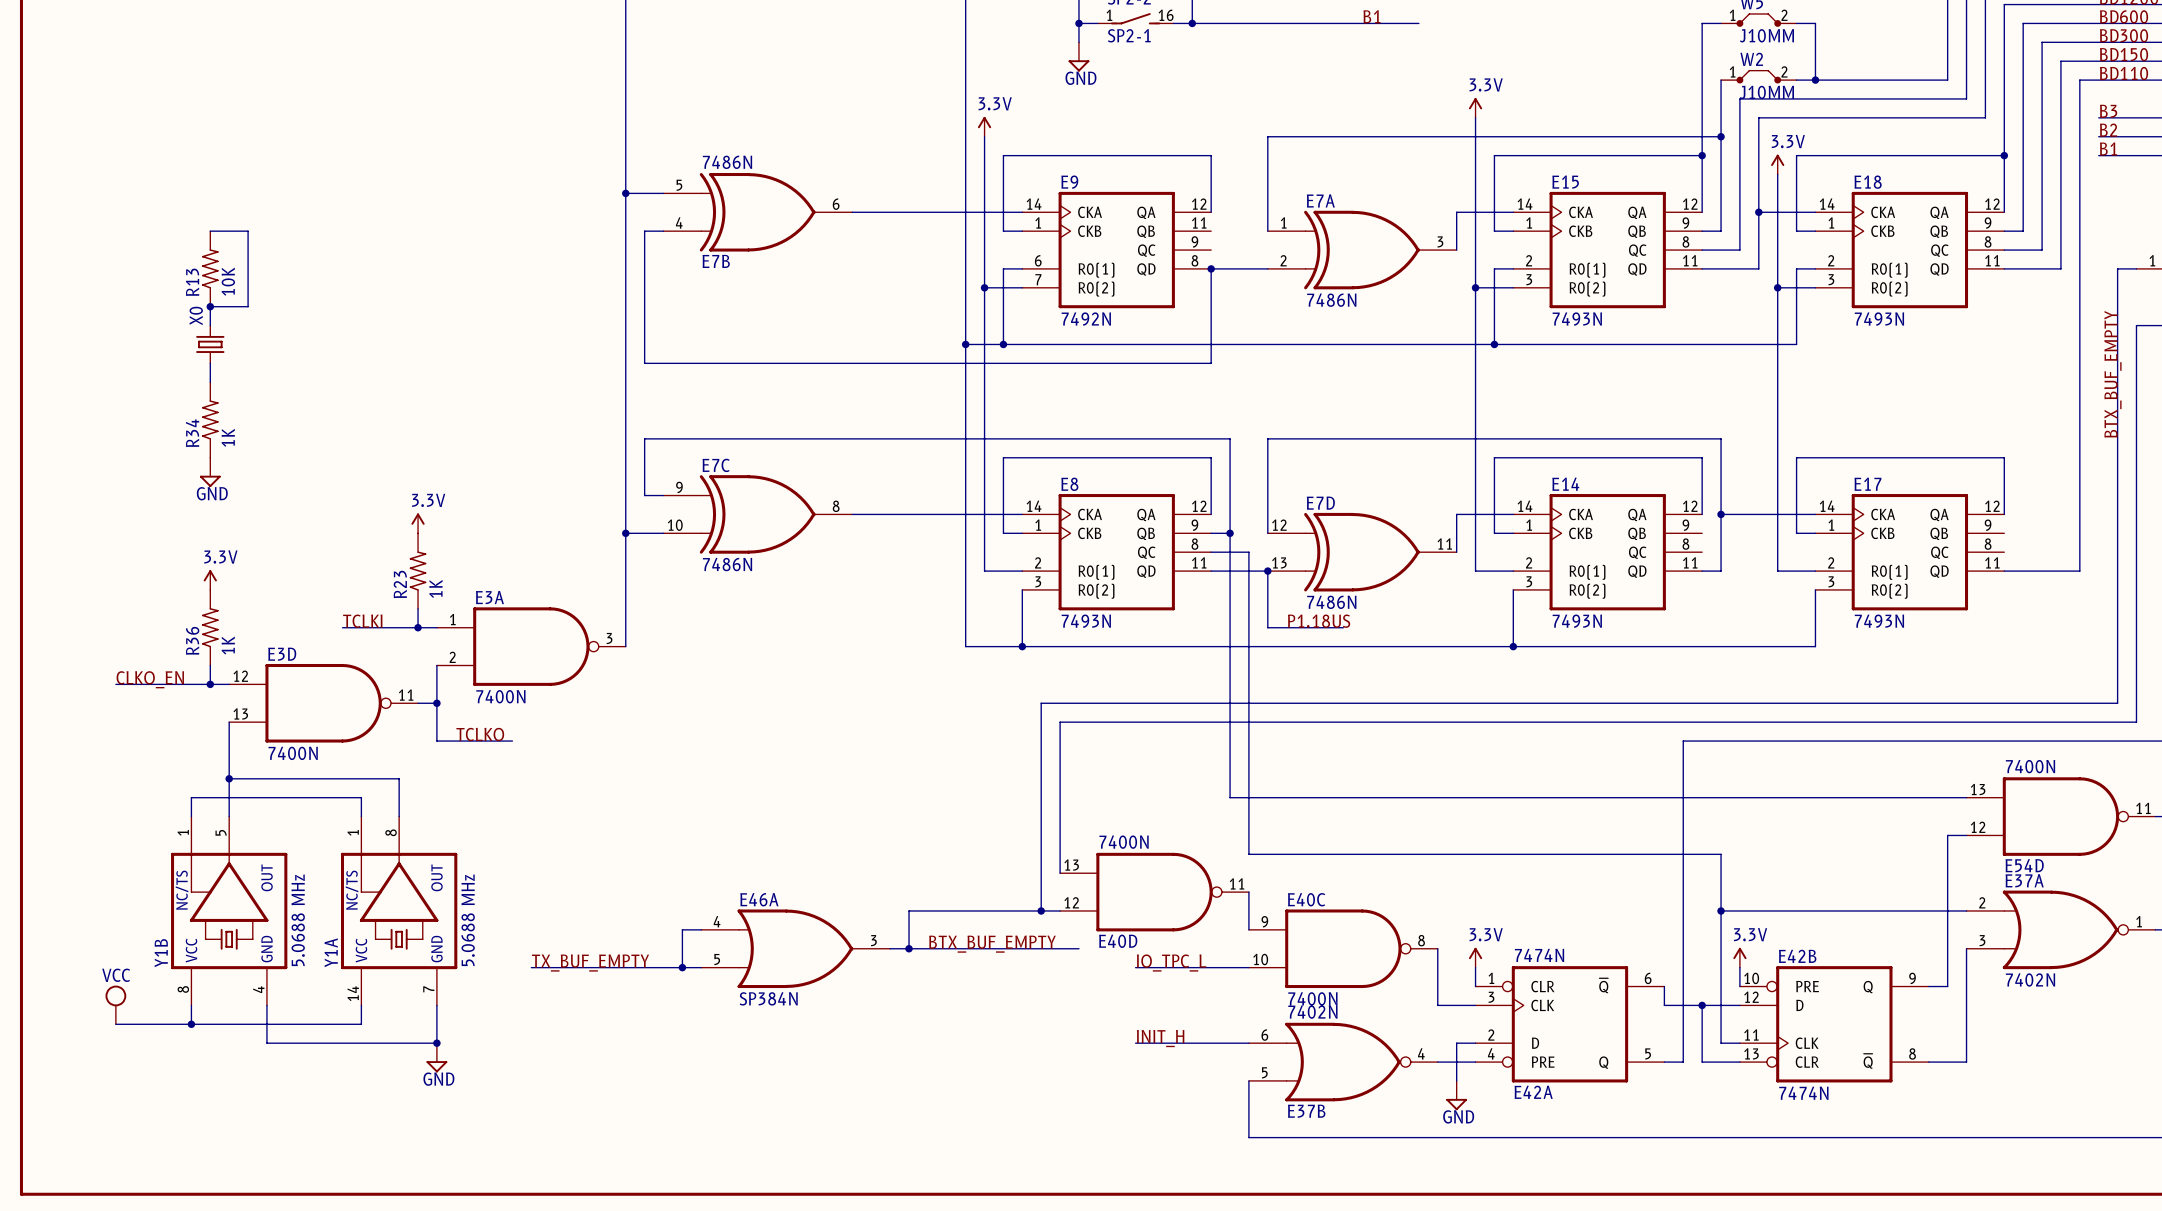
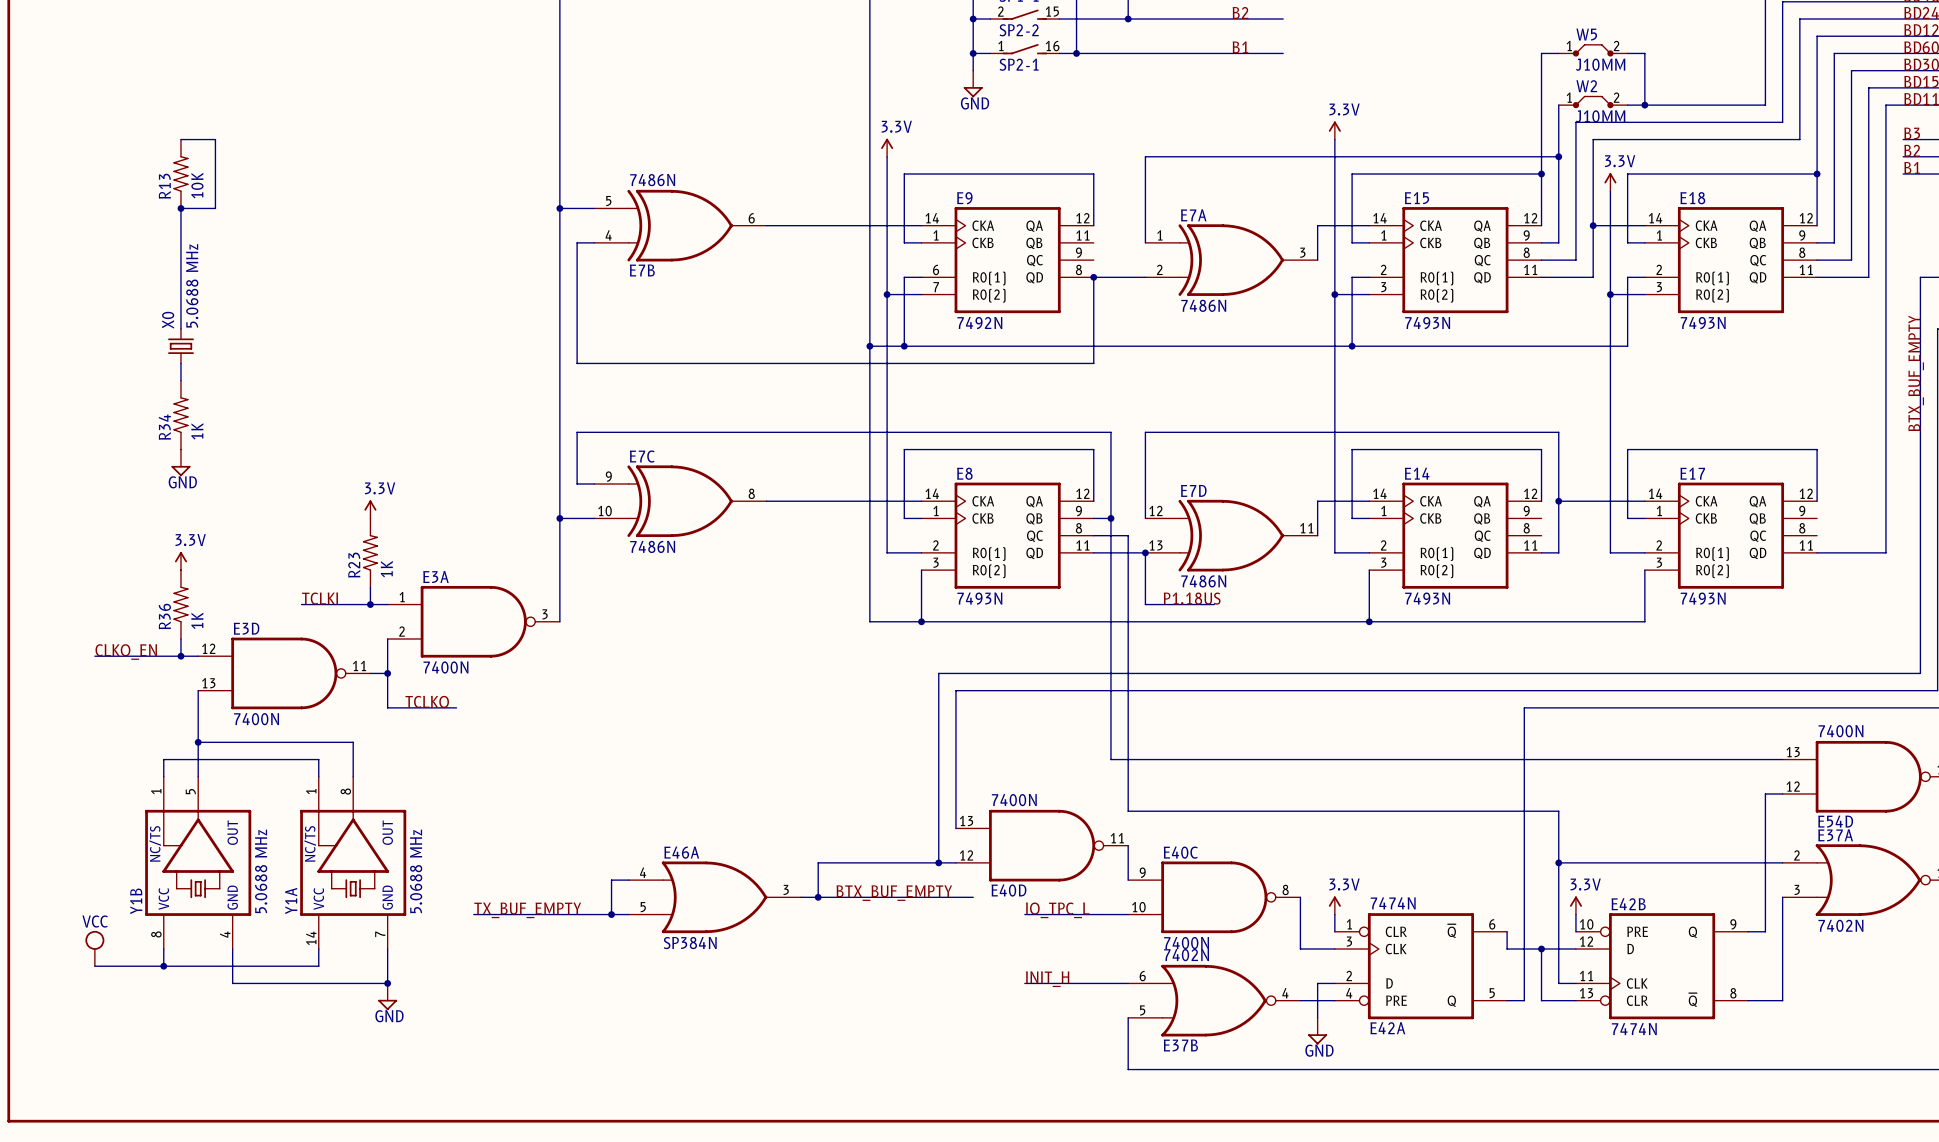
junction: none -> (180, 208)
wire: (210, 231) (248, 231) (248, 306) (210, 306) -> (180, 139) (215, 139) (215, 208) (180, 208) (180, 311)
R13 position: (210, 268) -> (180, 174)
X0 value: none -> 5.0688 MHz (192, 285)
junction: (210, 306) -> none

